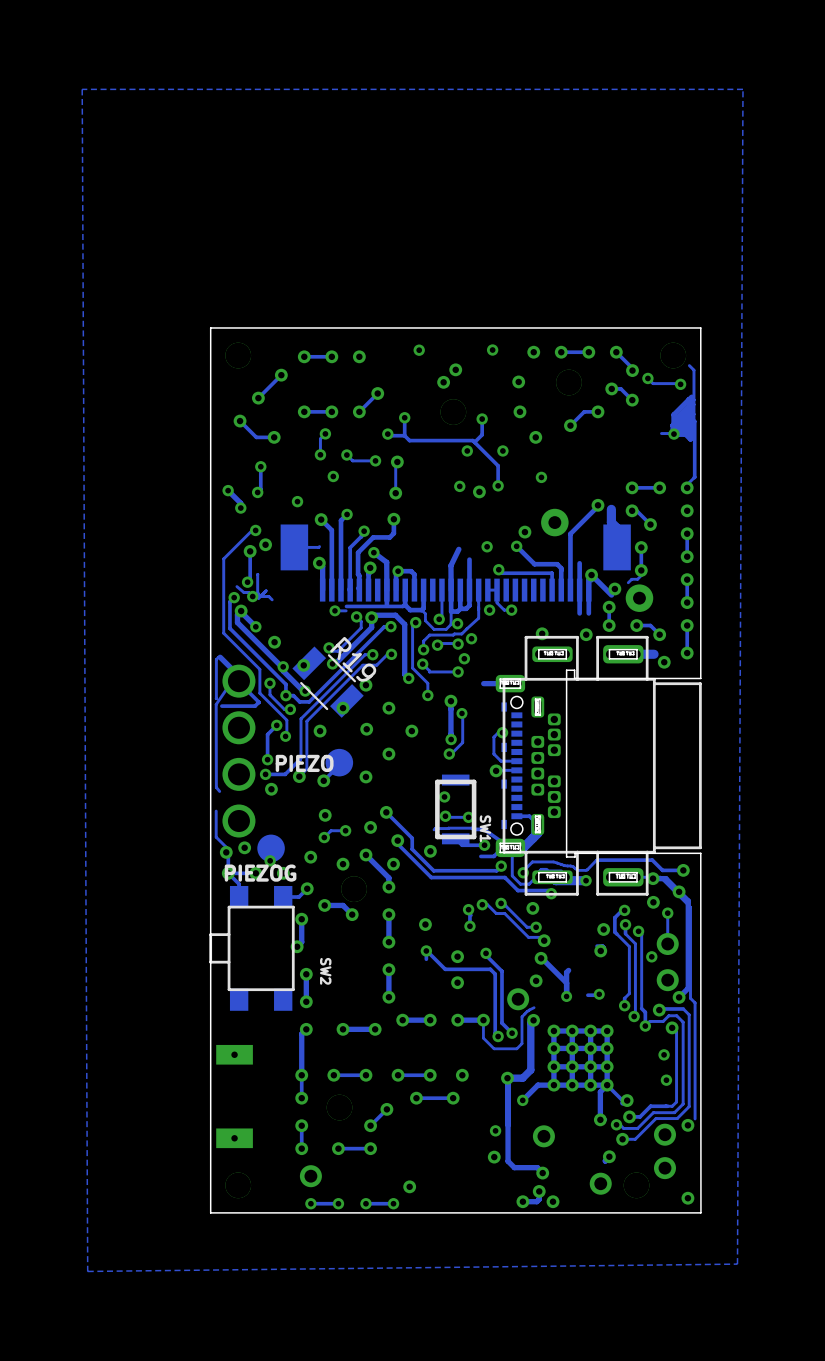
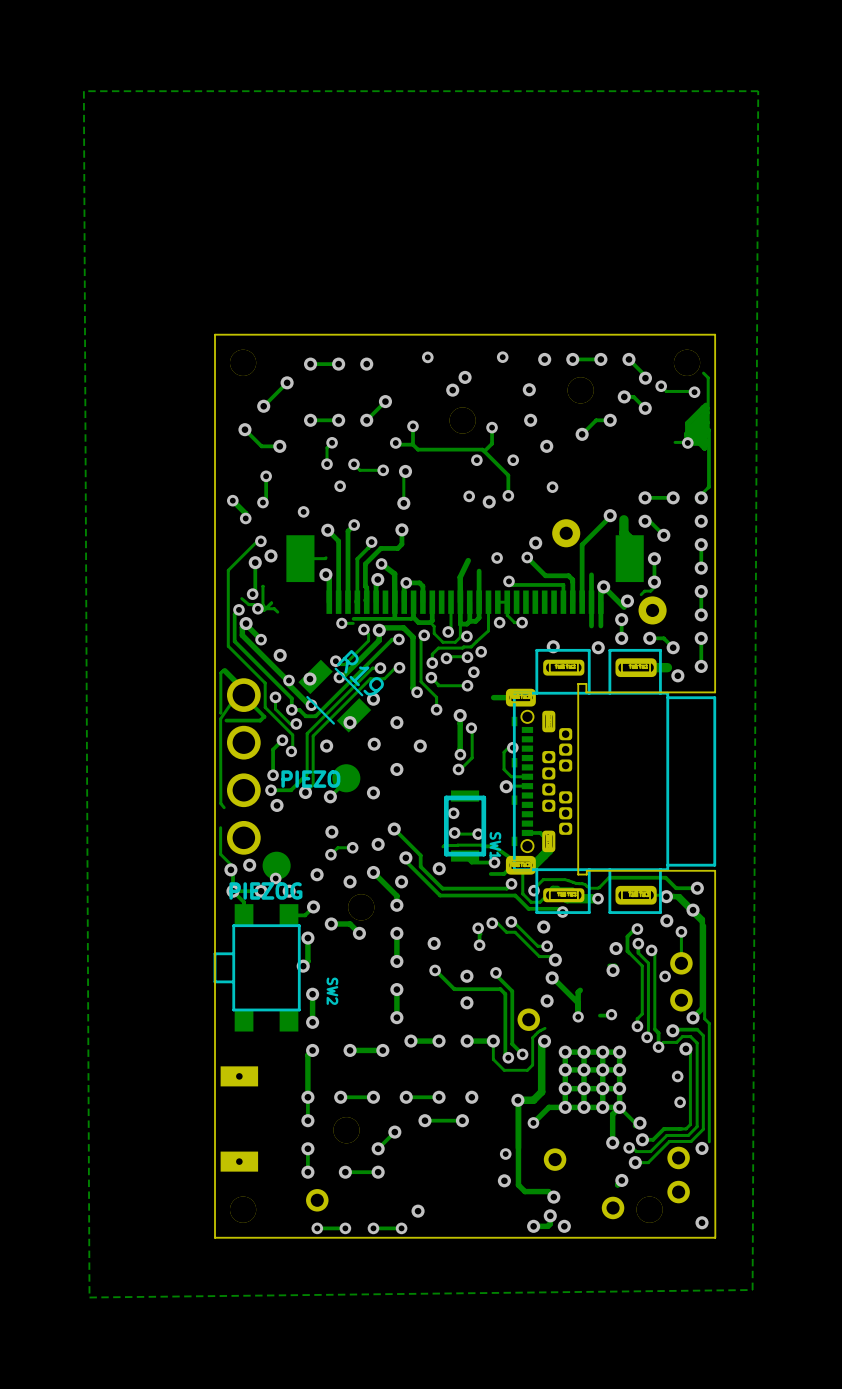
track: (426, 950) (426, 959) -> none

